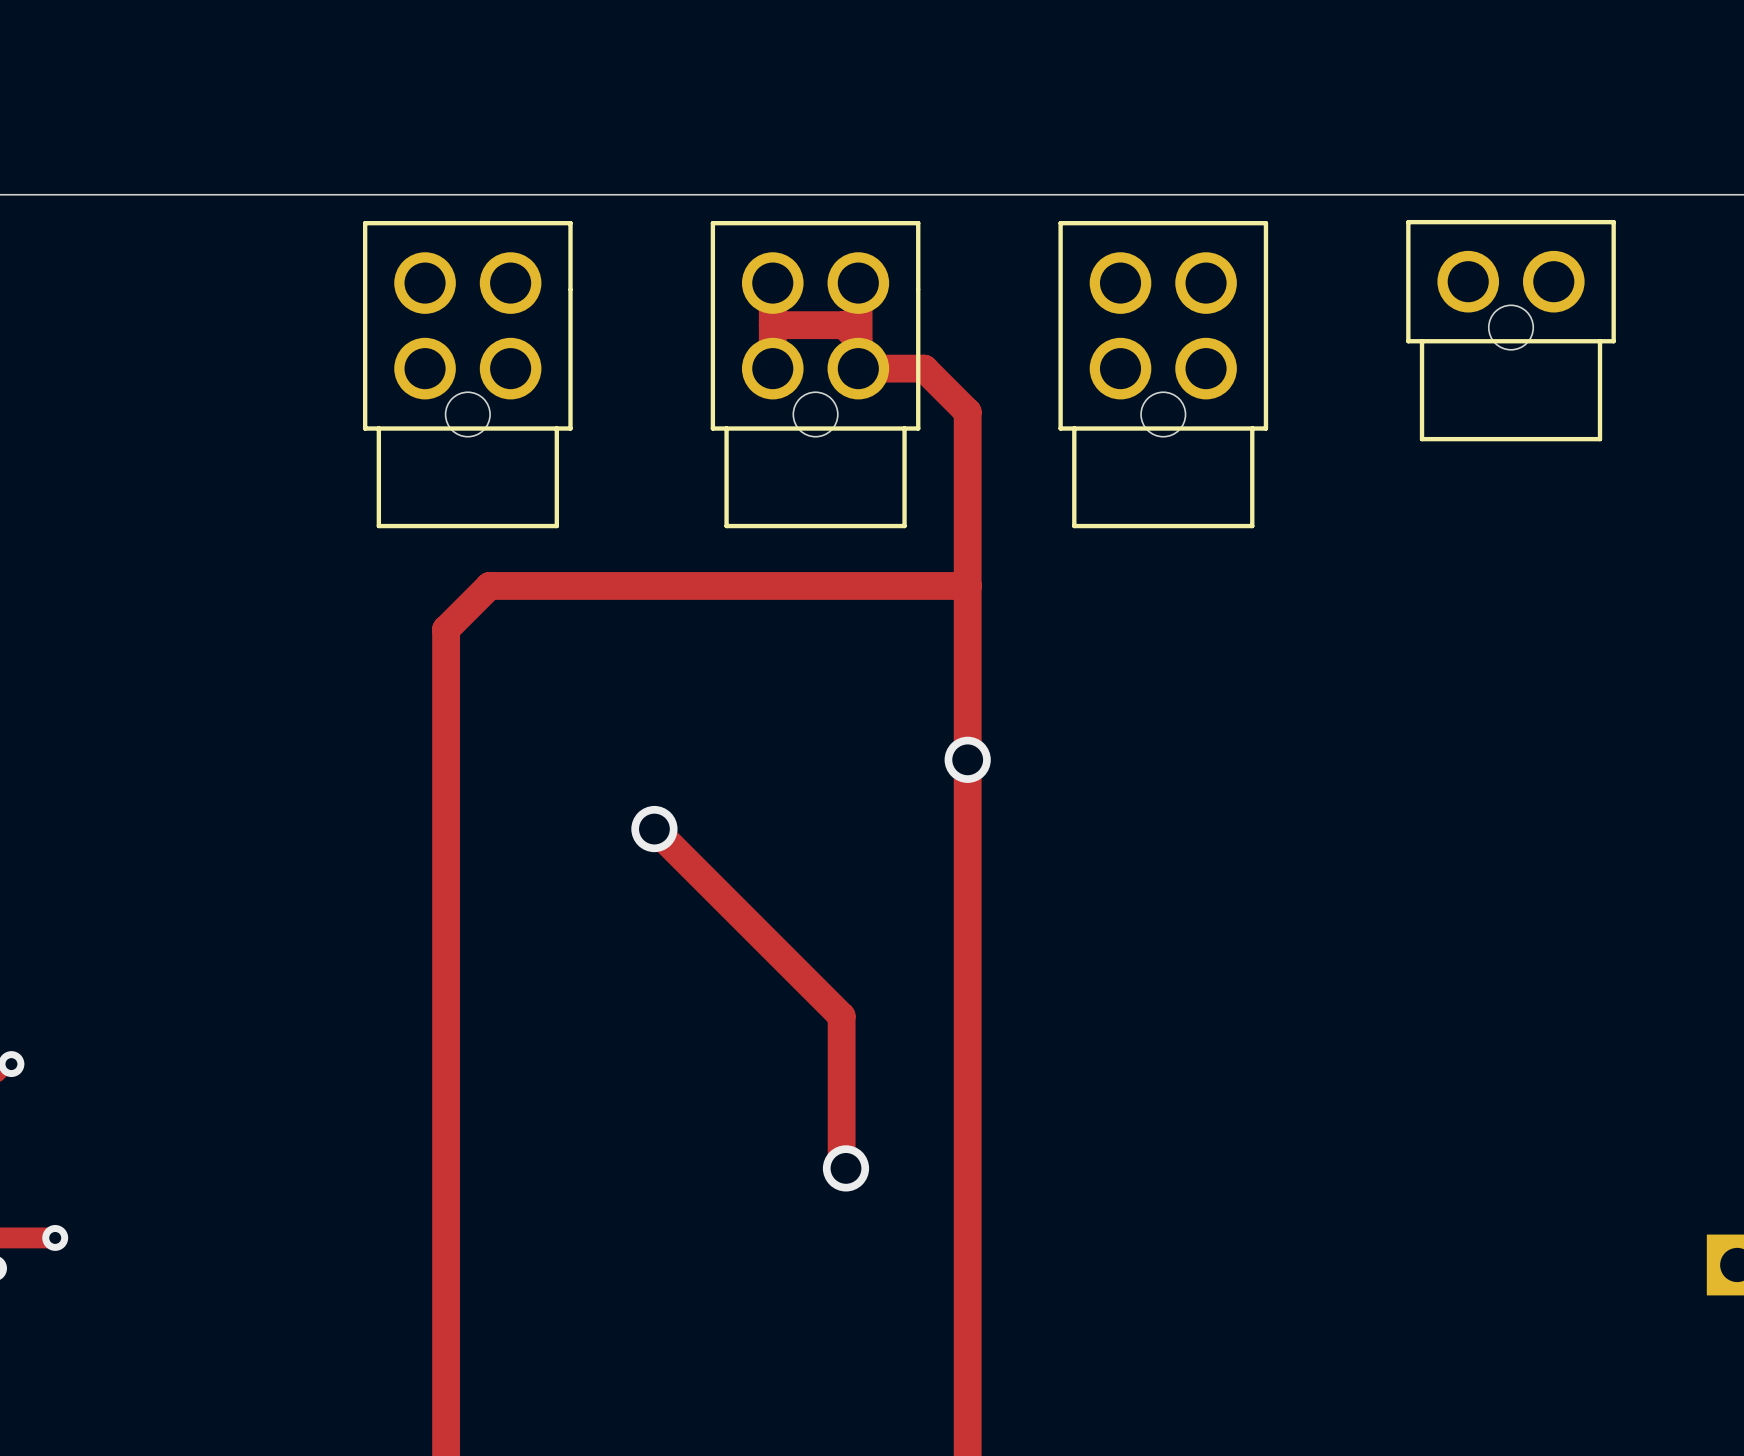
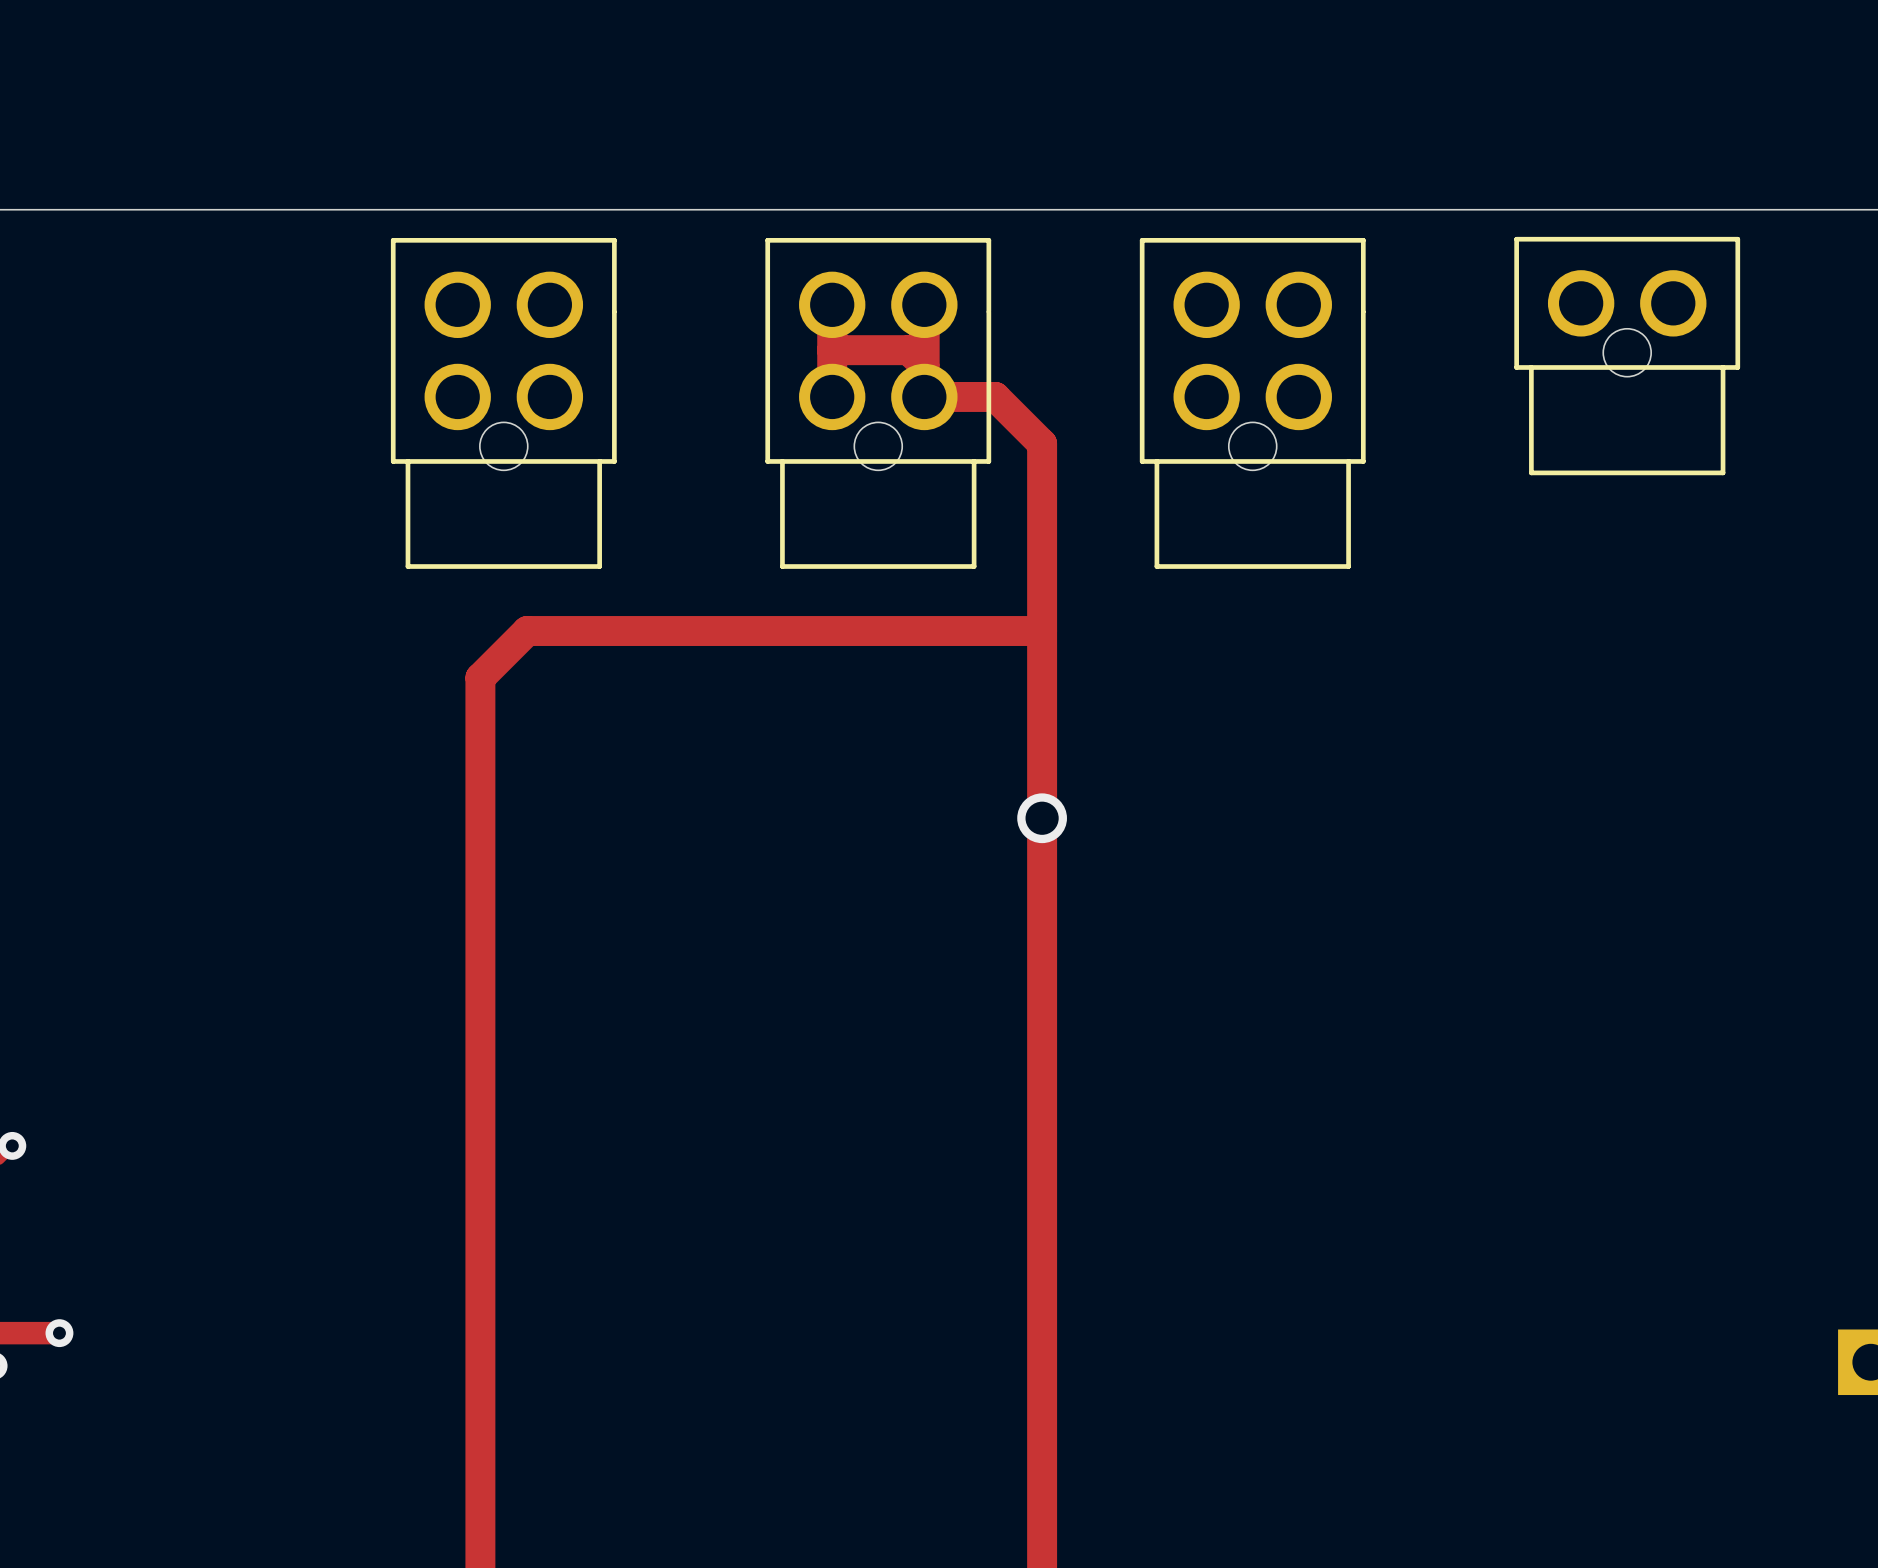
track: (654, 829) (841, 1016) (841, 1164) (845, 1168) -> none
via: (654, 829) -> none
via: (845, 1168) -> none

